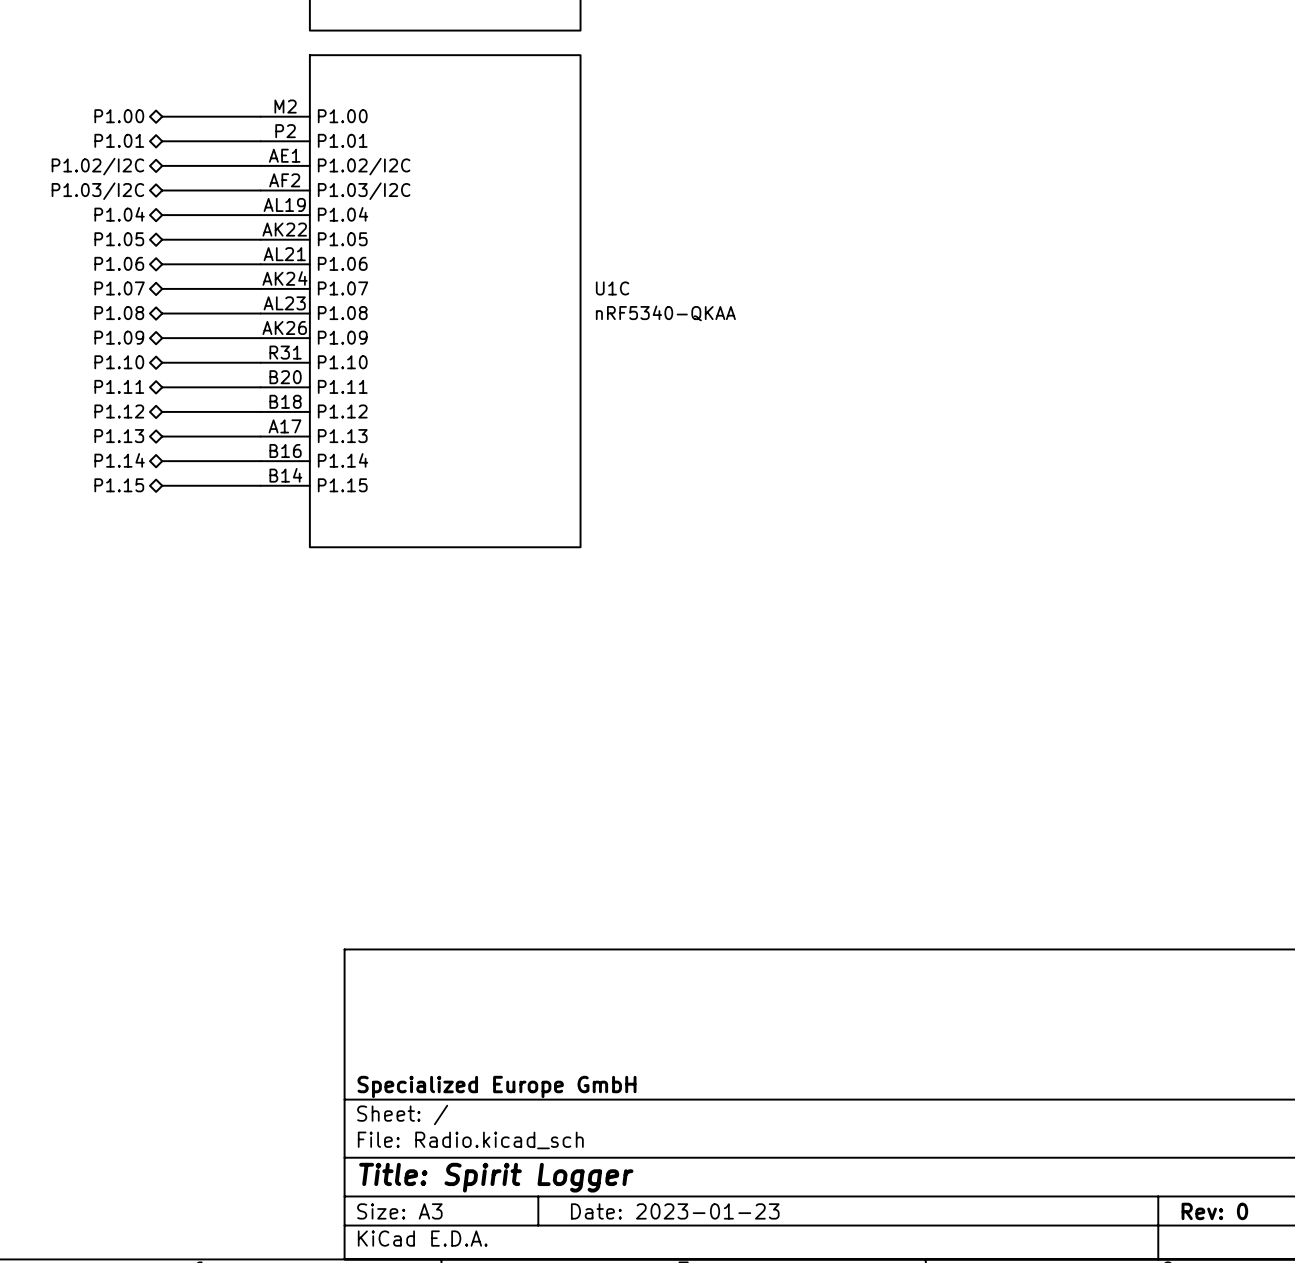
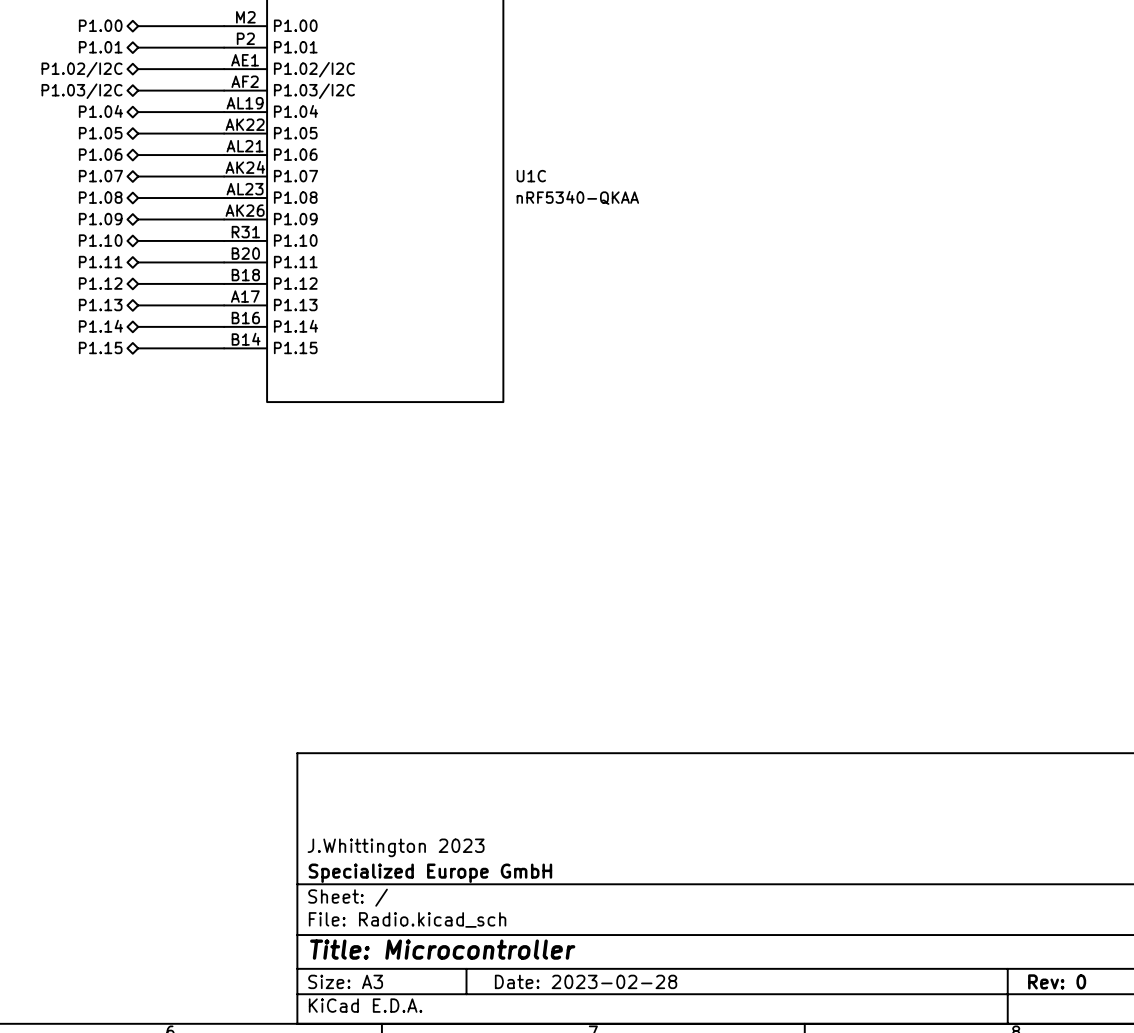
title block: none -> J.Whittington 2023 (396, 847)
title block: Title: Spirit Logger (496, 1177) -> Title: Microcontroller (442, 949)
title block: Date: 2023-01-23 (675, 1211) -> Date: 2023-02-28 (586, 981)

